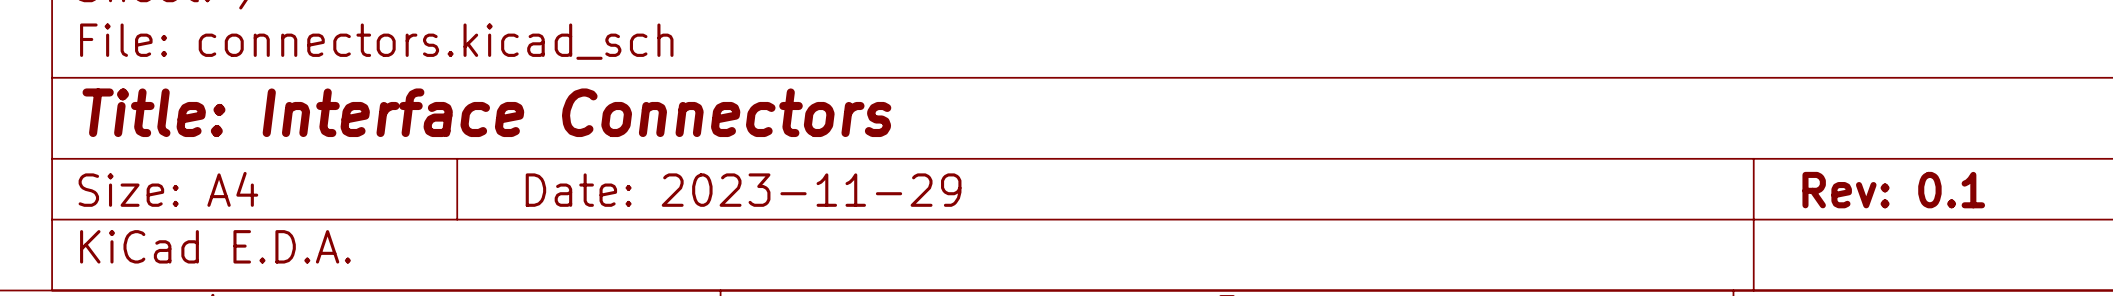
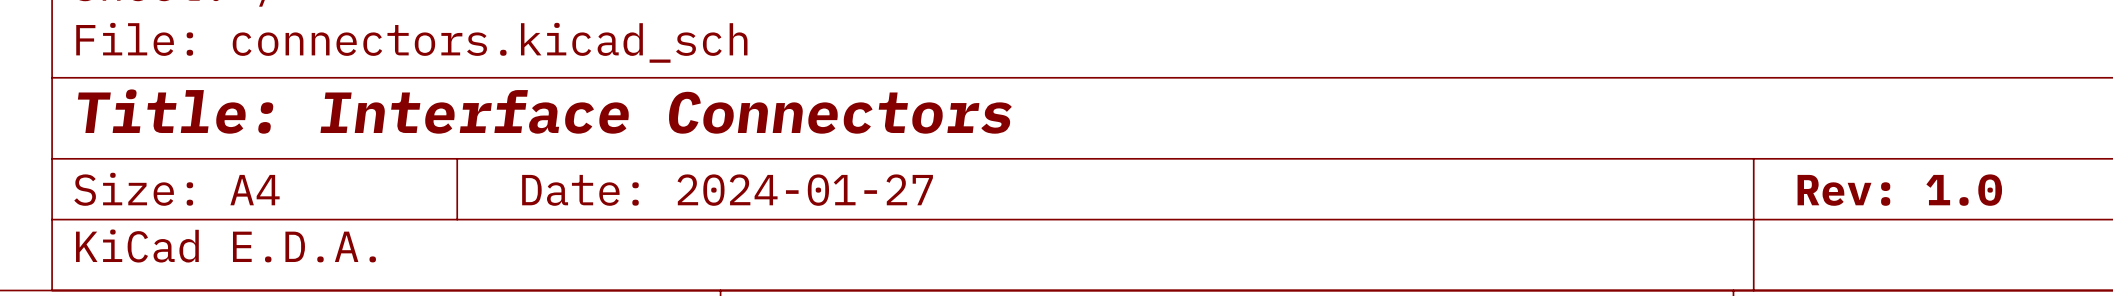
title block: Date: 2023-11-29 (743, 190) -> Date: 2024-01-27 (727, 190)
title block: Rev: 0.1 (1893, 190) -> Rev: 1.0 (1899, 190)

